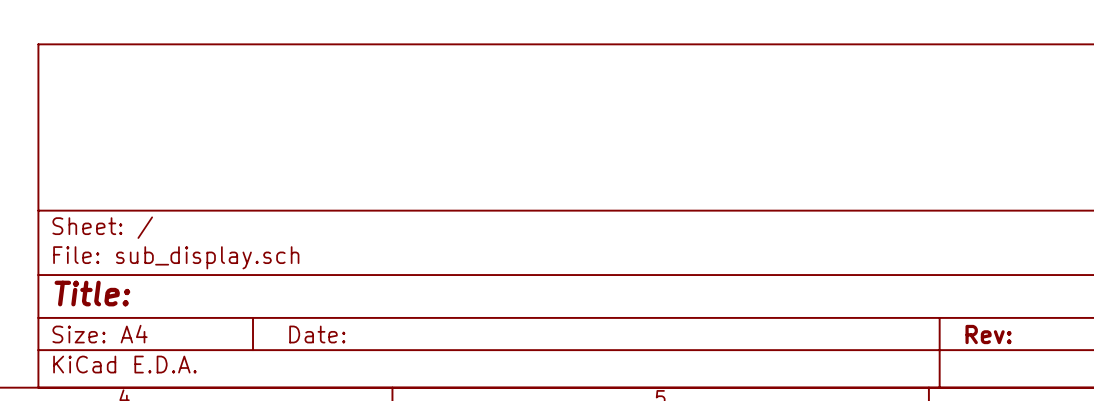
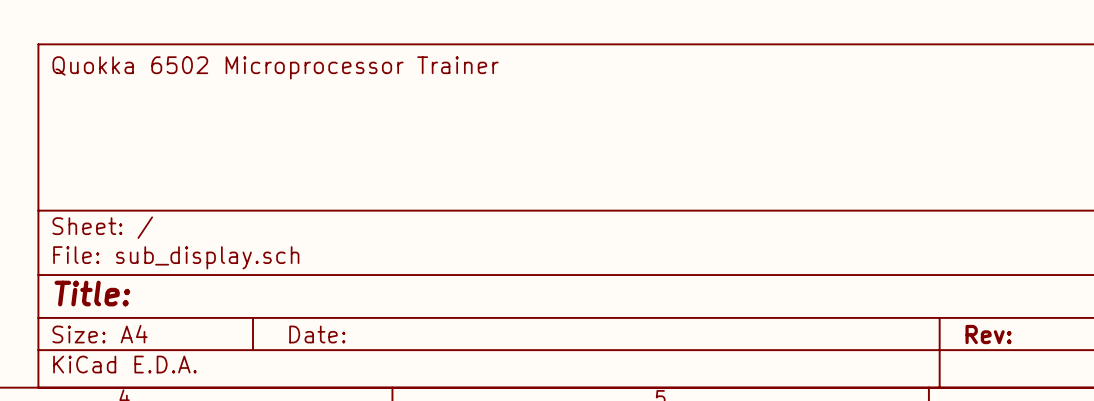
title block: none -> Quokka 6502 Microprocessor Trainer (275, 67)

